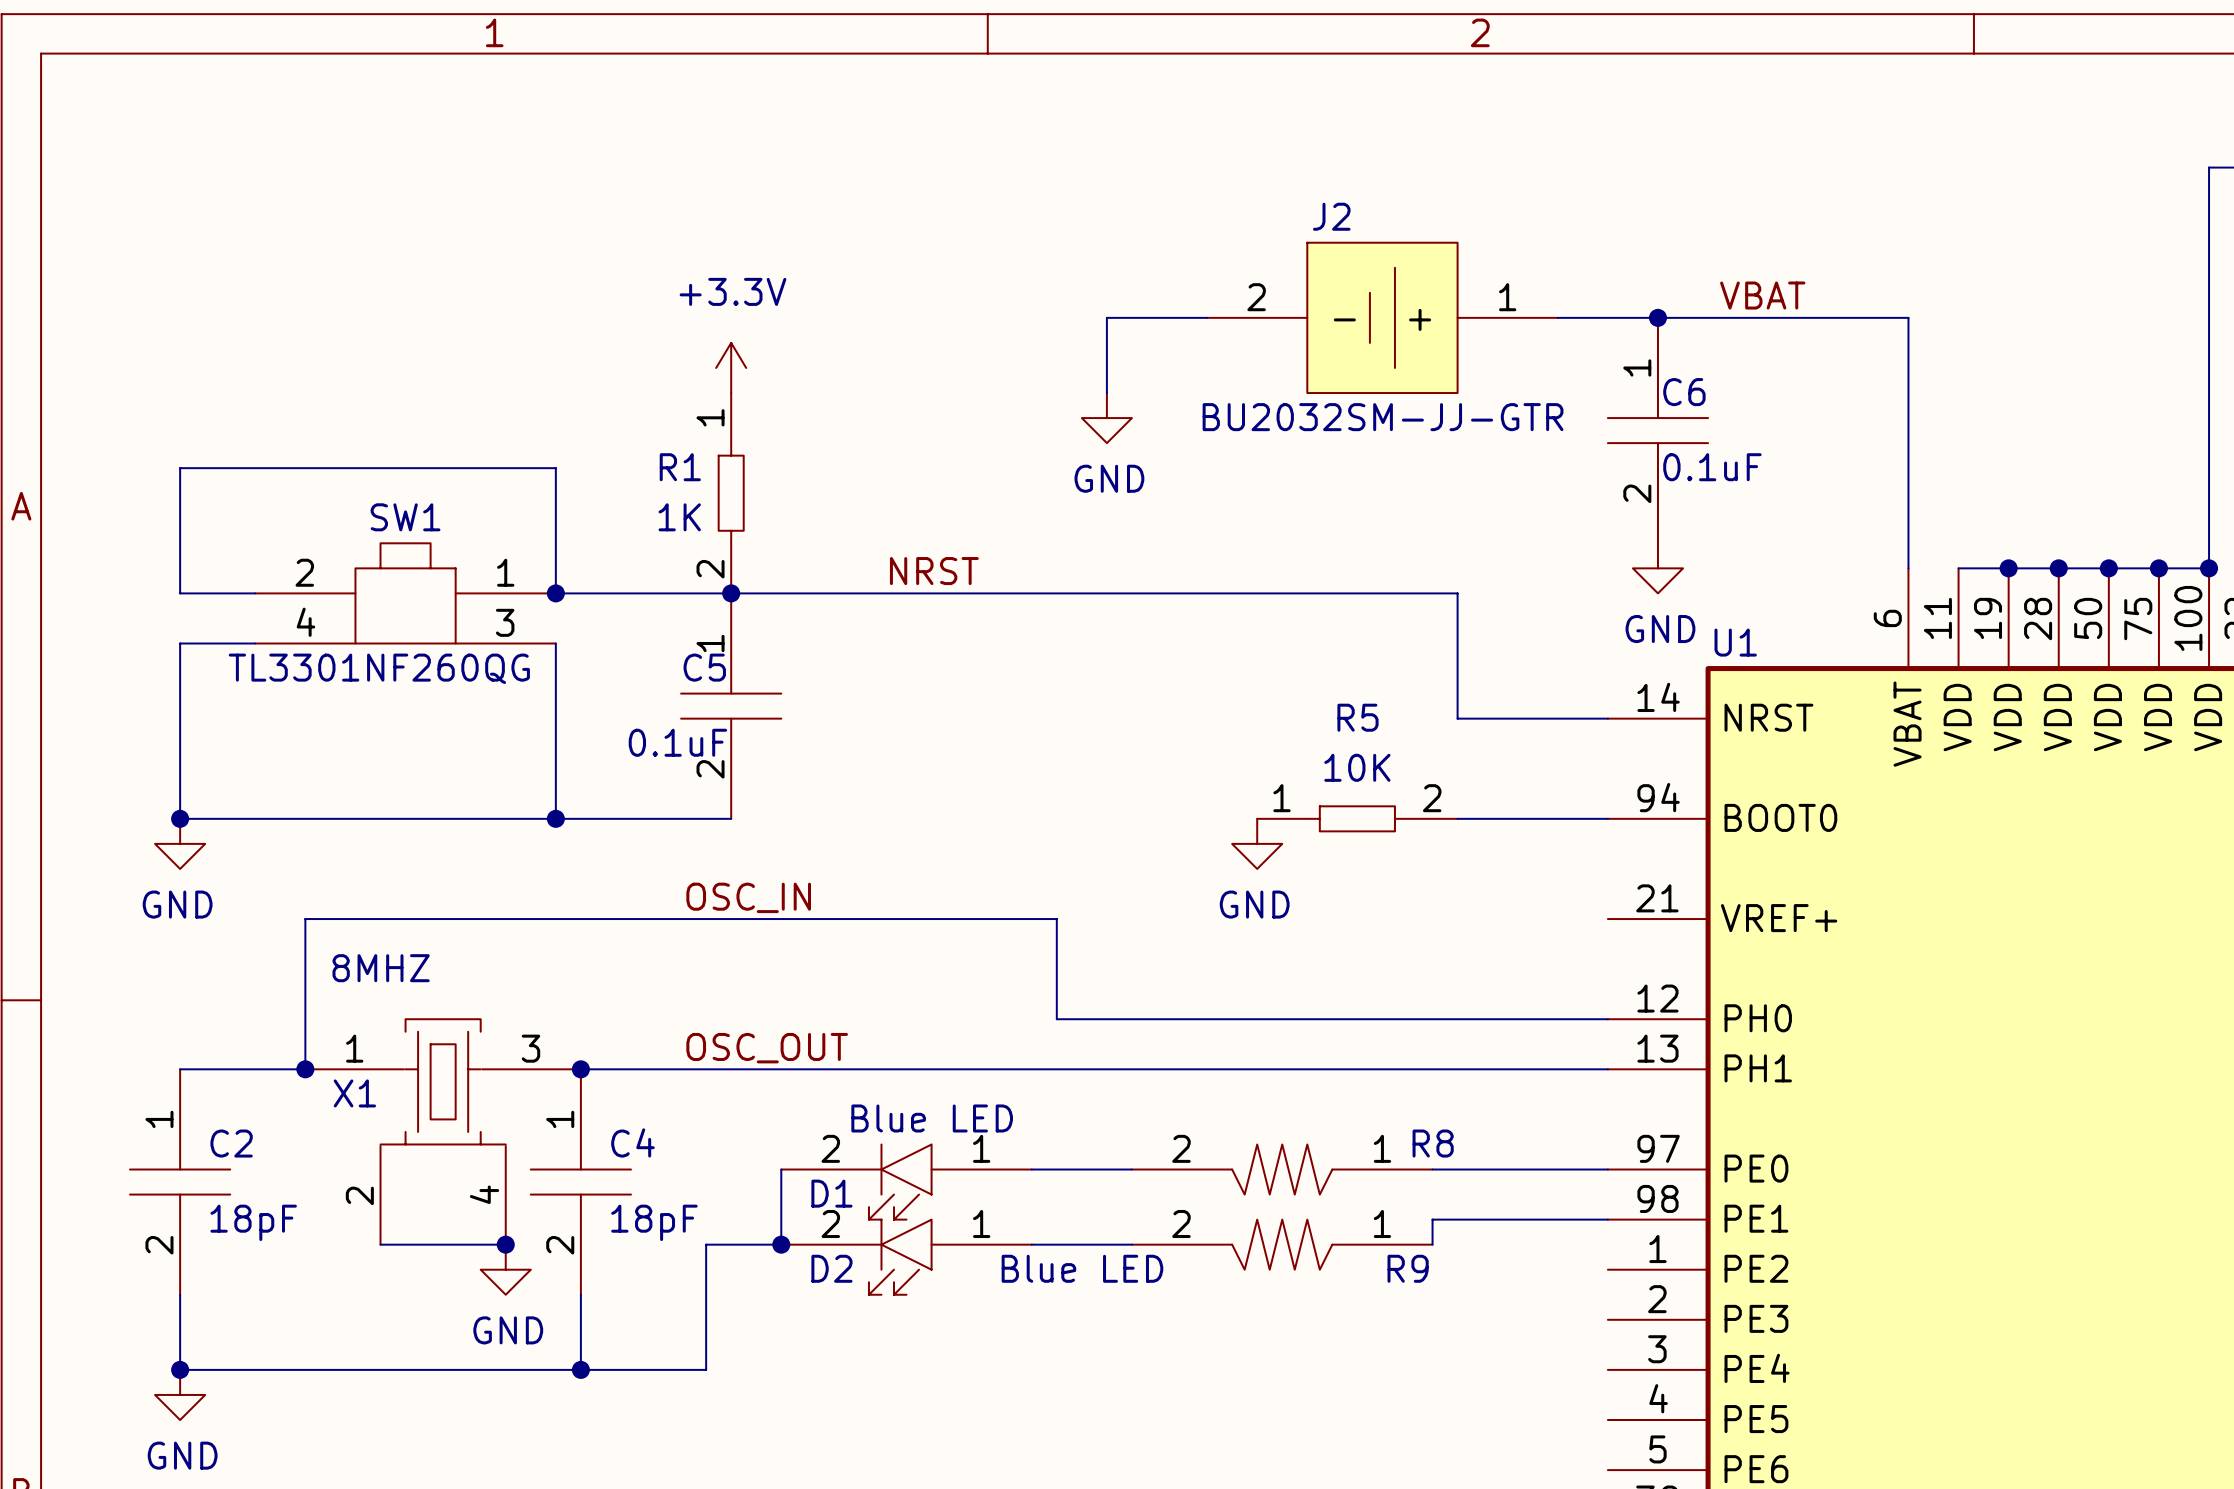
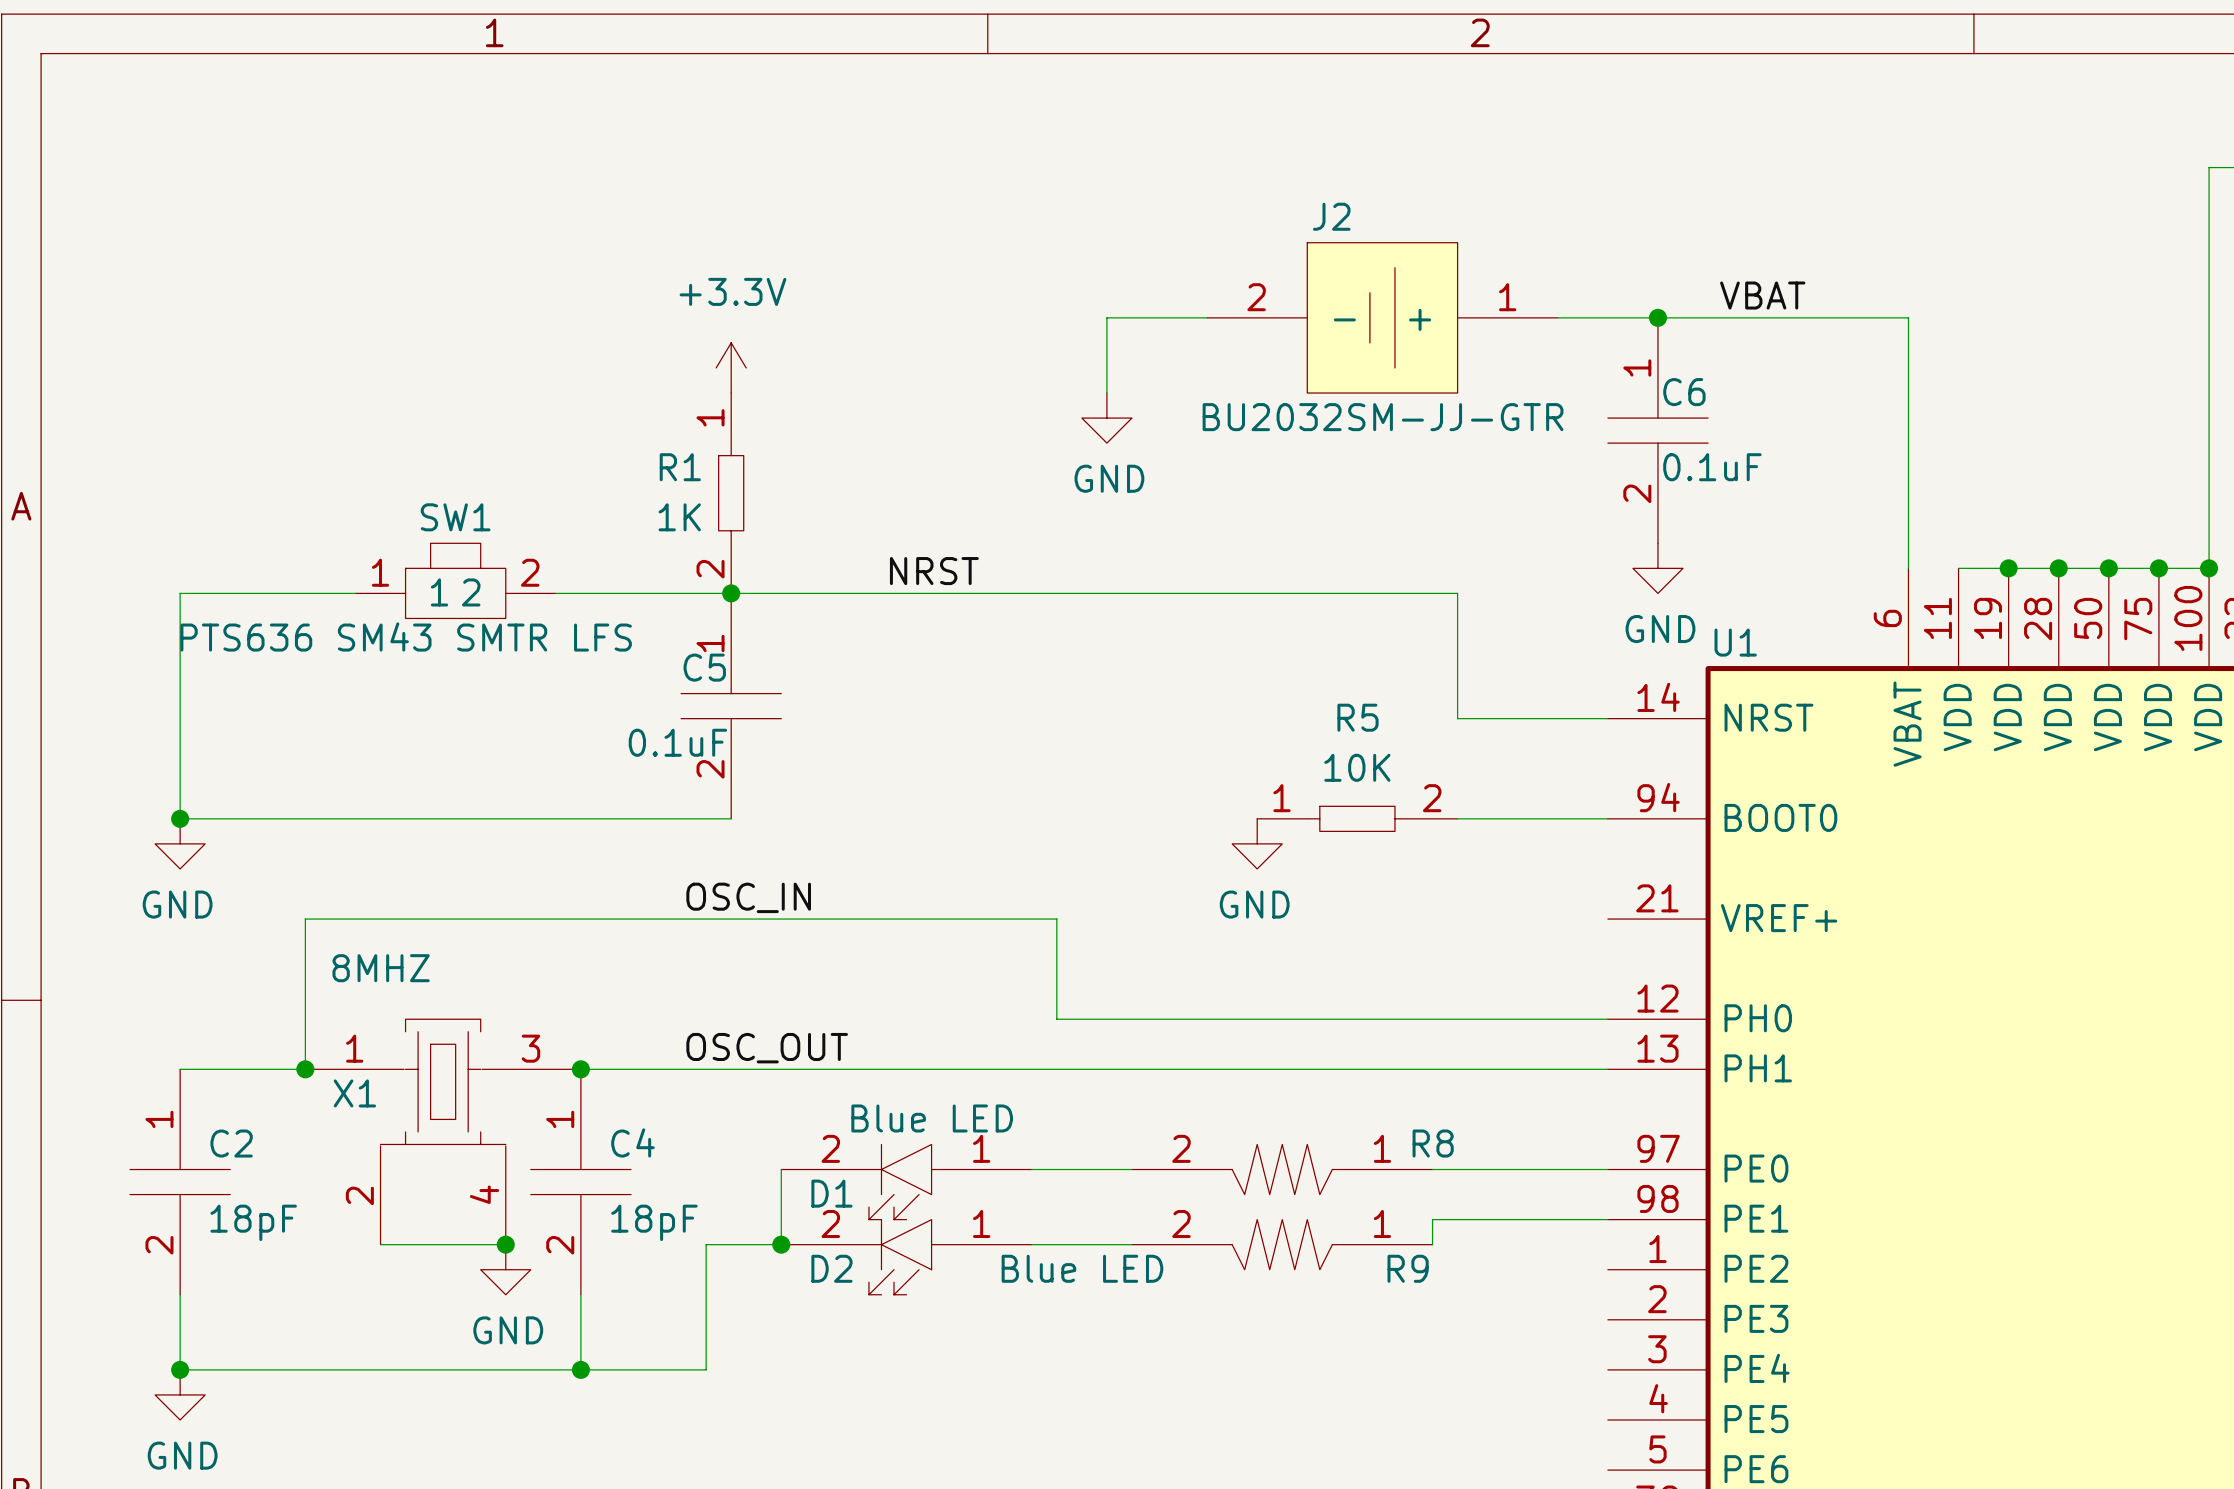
SW1 symbol: [255, 543, 556, 644] -> [355, 543, 556, 619]
wire: (180, 593) (180, 468) (555, 468) (555, 593) -> none
junction: (555, 593) -> none
wire: (180, 643) (255, 643) -> (180, 643) (180, 593)
wire: (555, 643) (555, 818) -> none
SW1 value: TL3301NF260QG (379, 668) -> PTS636 SM43 SMTR LFS (406, 636)
junction: (555, 818) -> none

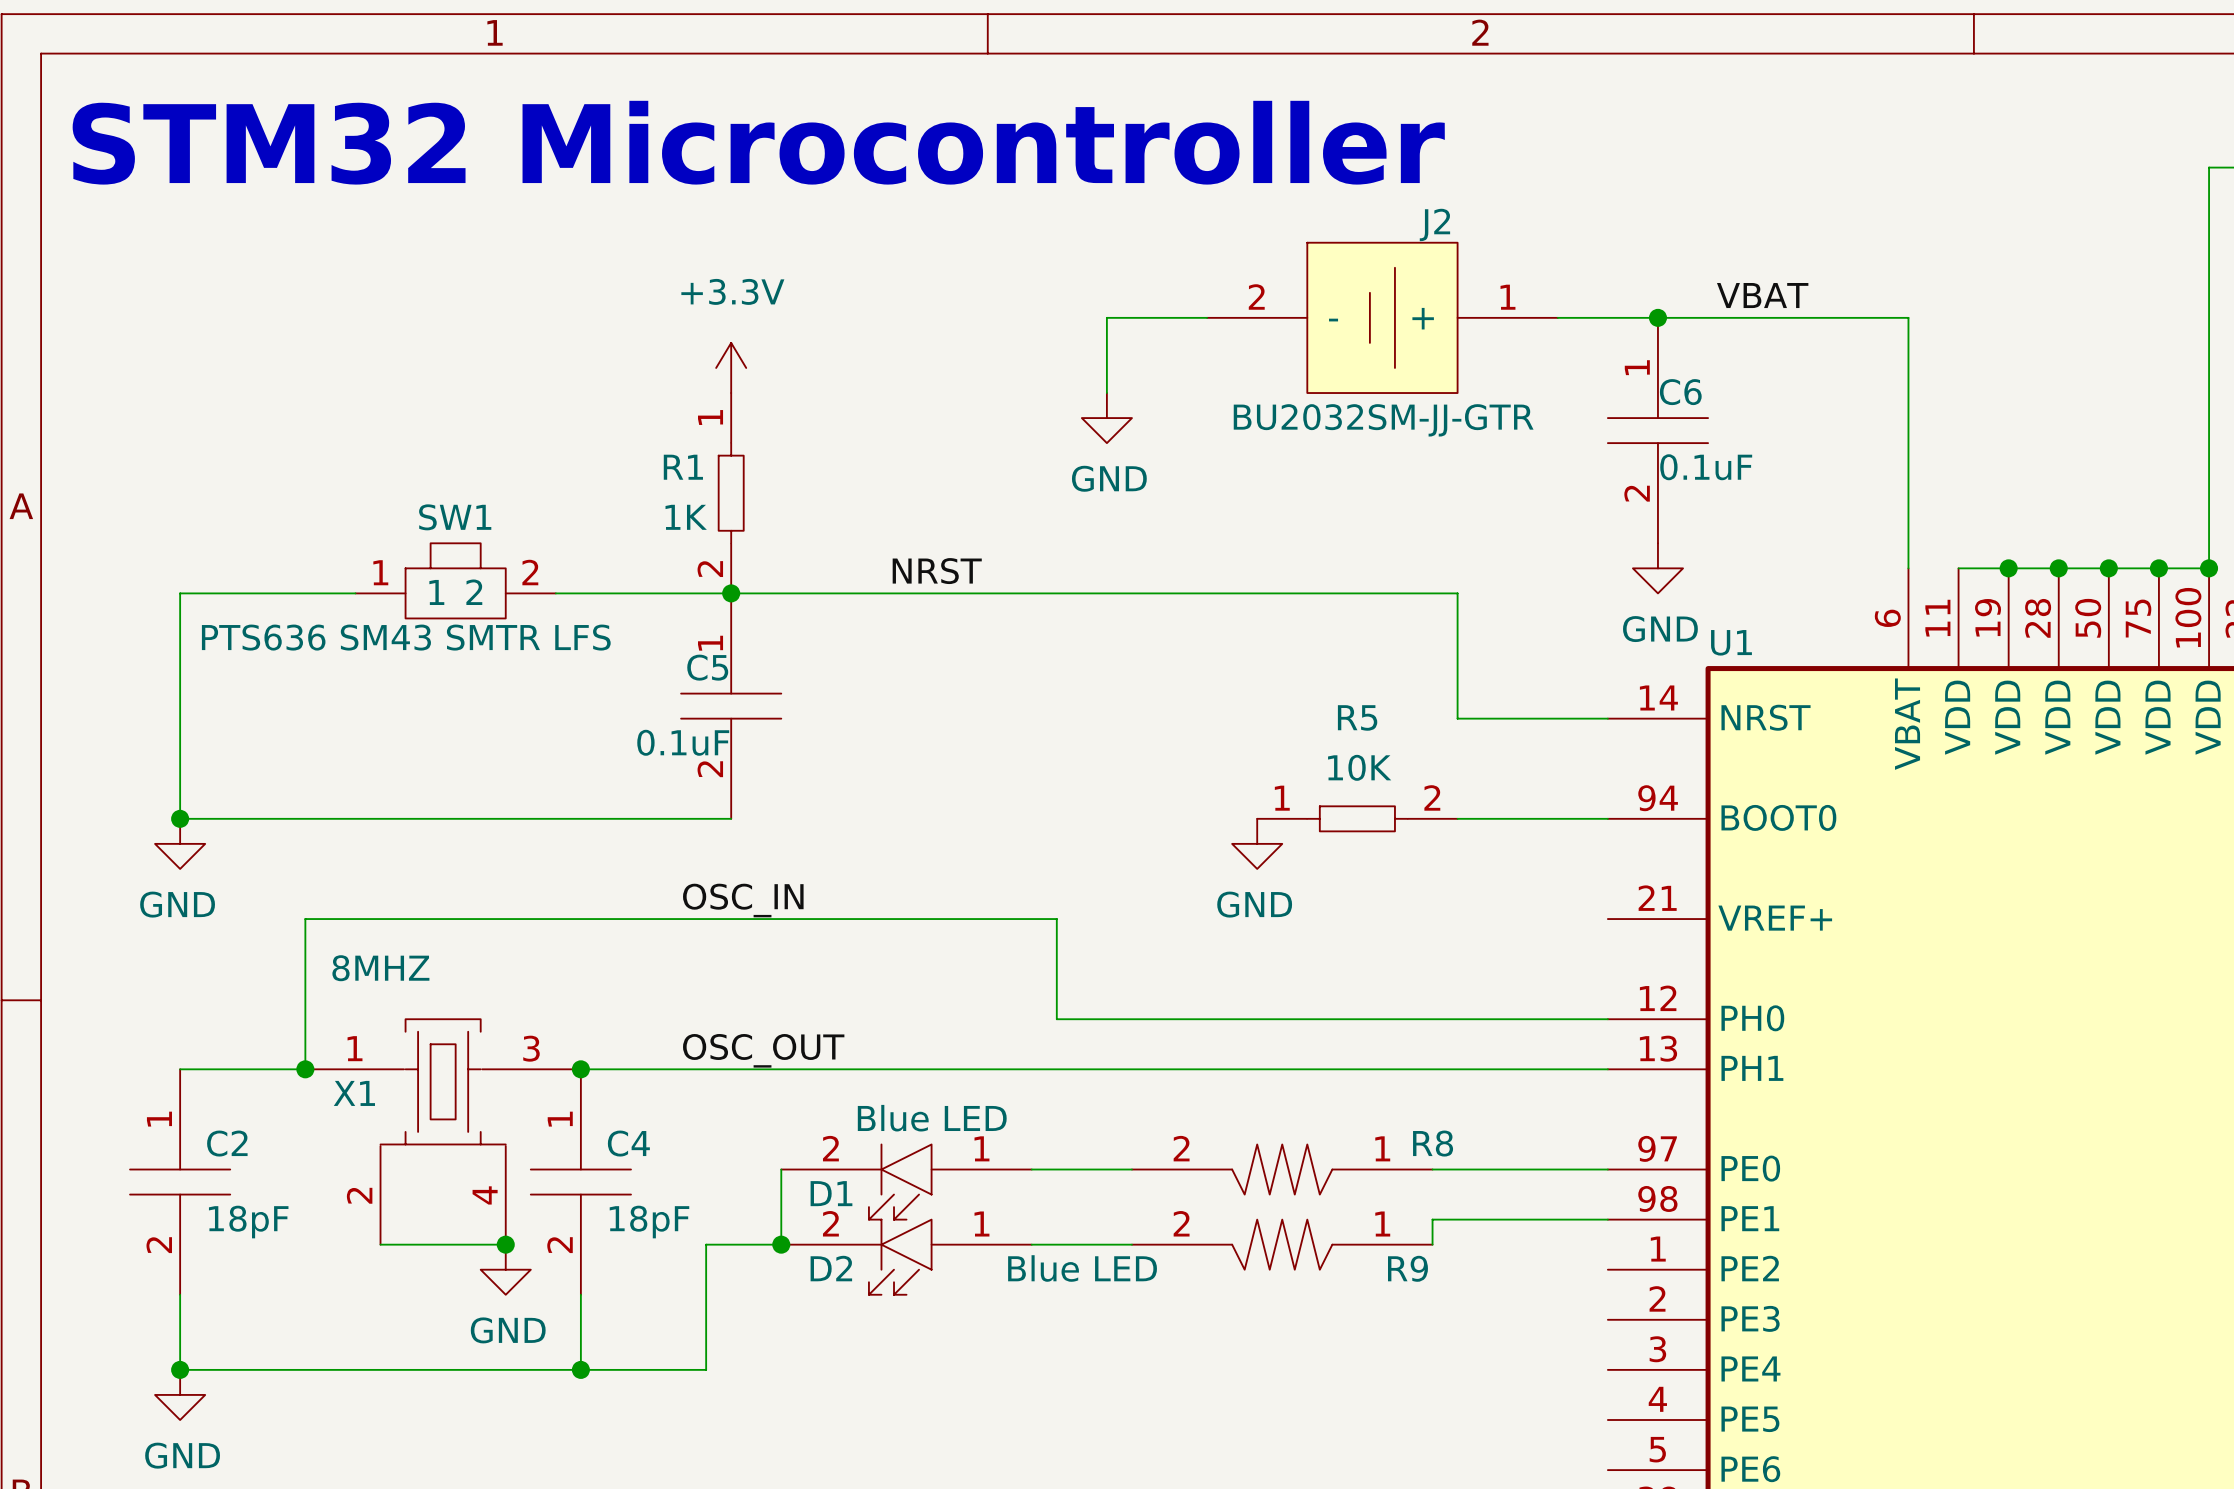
text: none -> STM32 Microcontroller (758, 142)
J2 name position: J2 (1331, 216) -> J2 (1434, 224)

